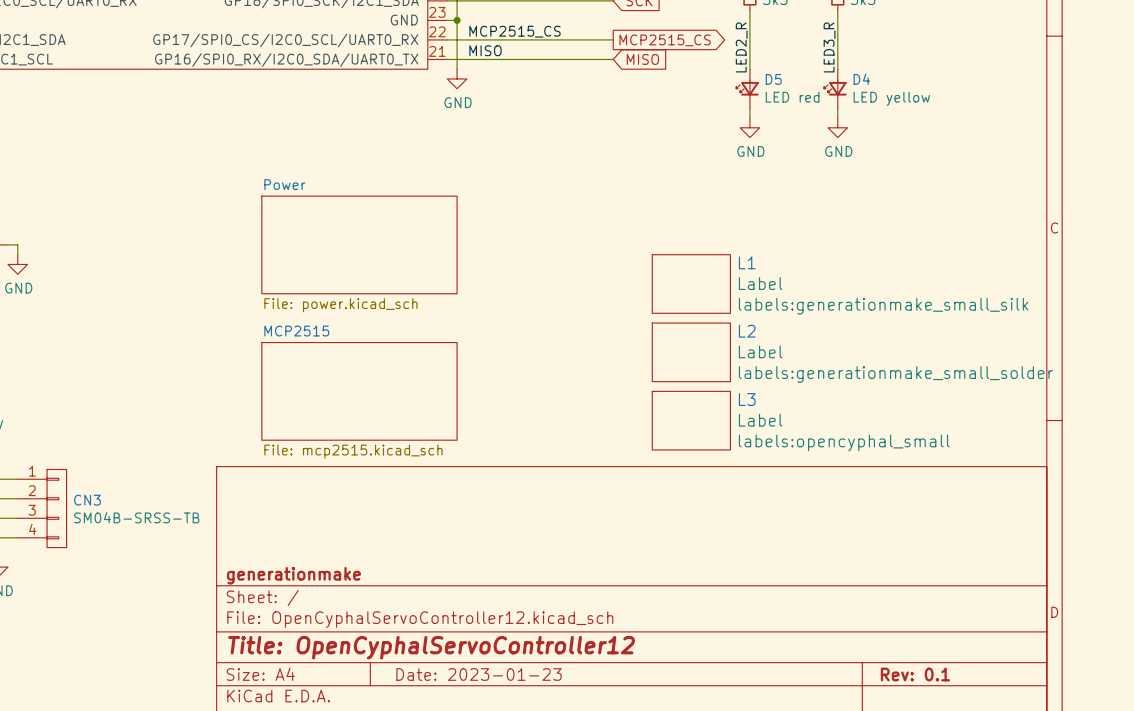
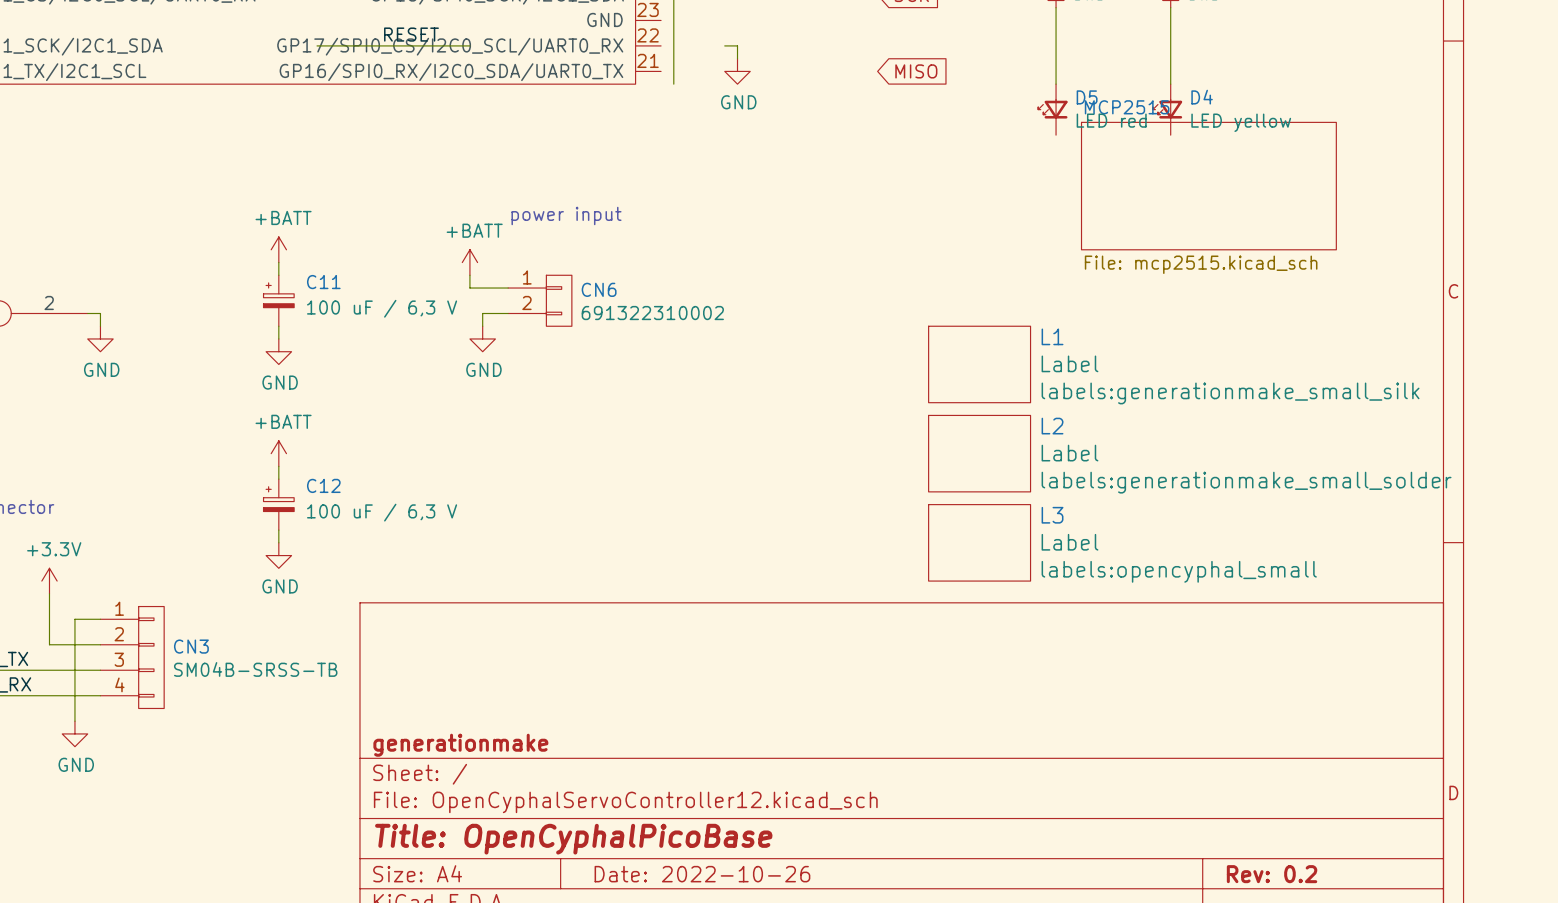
wire: (447, 20) (457, 20) -> none
junction: (457, 20) -> none
label: none -> RESET (411, 34)
label: MCP2515_CS (515, 31) -> none
wire: none -> (317, 45) (469, 45)
wire: (447, 39) (496, 39) -> none
wire: (505, 39) (613, 39) -> (737, 45) (737, 58)
global label: MCP2515_CS (665, 40) -> none
label: LED2_R (741, 47) -> none
label: LED3_R (829, 47) -> none
label: MISO (485, 50) -> none
wire: (447, 59) (613, 59) -> none
power symbol position: GND (457, 78) -> GND (737, 71)
wire: (749, 108) (749, 118) -> none
wire: (837, 108) (837, 118) -> none
power symbol: GND (749, 127) -> none
power symbol: GND (837, 127) -> none
text: none -> power input (566, 215)
power symbol: none -> +BATT (278, 249)
wire: none -> (278, 262) (278, 275)
power symbol: none -> +BATT (469, 262)
wire: none -> (469, 275) (469, 288) (508, 288)
C11: none -> 100 uF / 6,3 V (278, 300)
CN6: none -> 691322310002 (540, 300)
wire: none -> (508, 313) (482, 313) (482, 326)
sheet Power: File: power.kicad_sch (359, 244) -> none
wire: none -> (278, 326) (278, 338)
power symbol: none -> GND (482, 338)
power symbol: none -> GND (278, 351)
power symbol: none -> +BATT (278, 453)
wire: none -> (278, 466) (278, 479)
C12: none -> 100 uF / 6,3 V (278, 504)
sheet MCP2515 position: (359, 391) -> (1208, 186)
wire: none -> (278, 530) (278, 542)
power symbol: none -> GND (278, 555)
title block: Title: OpenCyphalServoController12 (431, 647) -> Title: OpenCyphalPicoBase (573, 839)
title block: Date: 2023-01-23 (479, 674) -> Date: 2022-10-26 (702, 874)
title block: Rev: 0.1 (915, 674) -> Rev: 0.2 (1272, 874)

